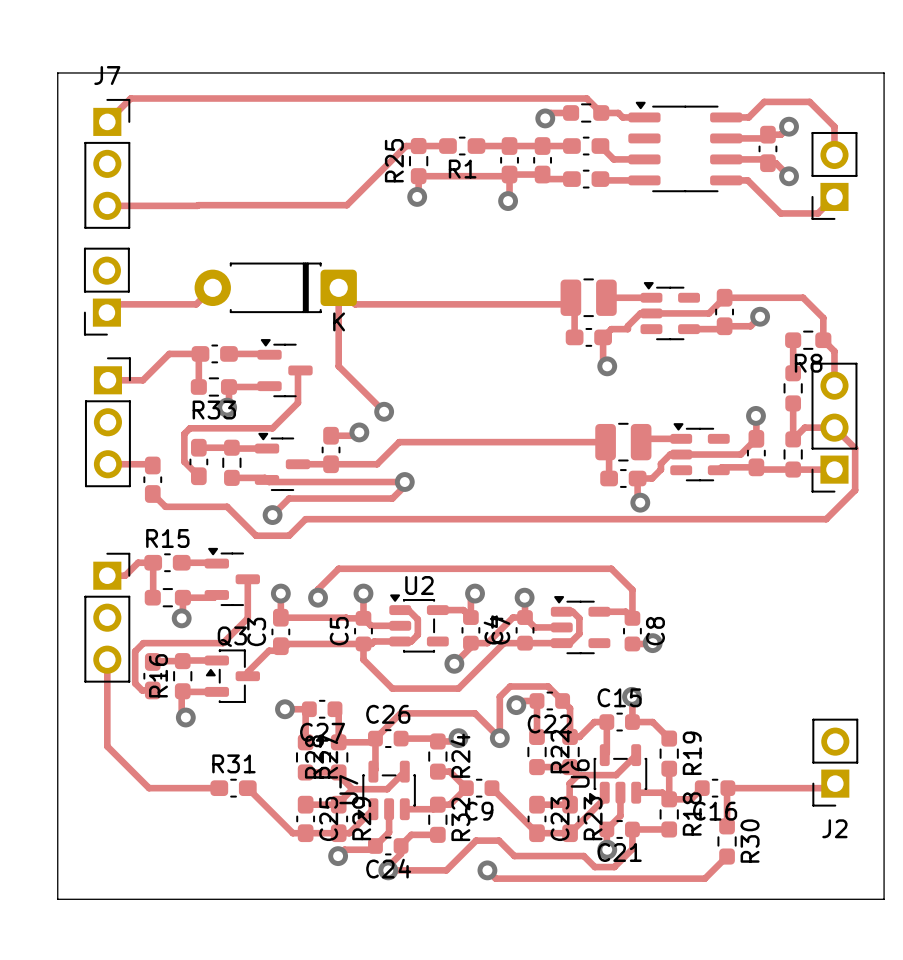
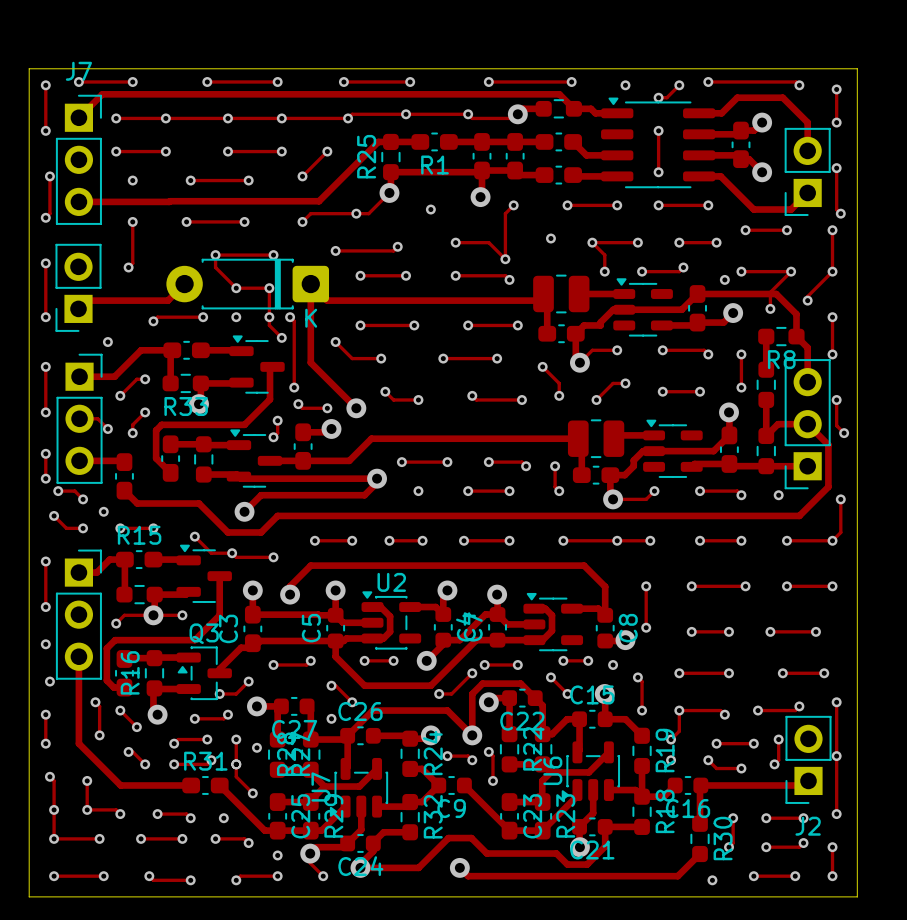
track: none -> (78, 81) (132, 81)
via: none -> (78, 81)
via: none -> (132, 81)
track: none -> (207, 81) (277, 81)
via: none -> (207, 81)
via: none -> (277, 81)
track: none -> (343, 81) (410, 81)
via: none -> (343, 81)
via: none -> (410, 81)
track: none -> (488, 81) (571, 81)
via: none -> (488, 81)
via: none -> (571, 81)
track: none -> (708, 81) (796, 81) (799, 85)
via: none -> (708, 81)
track: none -> (45, 85) (45, 130)
via: none -> (45, 85)
via: none -> (625, 85)
track: none -> (679, 85) (666, 97) (658, 97)
via: none -> (679, 85)
via: none -> (799, 85)
track: none -> (836, 89) (836, 122)
via: none -> (836, 89)
via: none -> (658, 97)
via: none -> (406, 114)
via: none -> (468, 114)
track: none -> (517, 114) (513, 118) (472, 118) (468, 114) (352, 114) (348, 118) (116, 118)
via: none -> (116, 118)
via: none -> (165, 118)
via: none -> (227, 118)
via: none -> (281, 118)
via: none -> (348, 118)
via: none -> (836, 122)
via: none -> (45, 130)
track: none -> (658, 130) (658, 172)
via: none -> (658, 130)
track: none -> (116, 151) (165, 151)
via: none -> (116, 151)
via: none -> (165, 151)
track: none -> (227, 151) (281, 151)
via: none -> (227, 151)
via: none -> (281, 151)
track: none -> (327, 151) (302, 176)
via: none -> (327, 151)
track: none -> (836, 168) (836, 209) (840, 213)
via: none -> (836, 168)
via: none -> (658, 172)
track: none -> (49, 176) (49, 213) (45, 217)
via: none -> (49, 176)
via: none -> (302, 176)
via: none -> (132, 180)
track: none -> (190, 180) (248, 180)
via: none -> (190, 180)
via: none -> (248, 180)
track: none -> (389, 192) (368, 213) (310, 213) (302, 221)
track: none -> (513, 205) (505, 213) (505, 259) (488, 242) (455, 242)
via: none -> (513, 205)
track: none -> (567, 205) (617, 205)
via: none -> (567, 205)
via: none -> (617, 205)
track: none -> (658, 205) (708, 205)
via: none -> (658, 205)
via: none -> (708, 205)
via: none -> (430, 209)
via: none -> (356, 213)
via: none -> (840, 213)
via: none -> (45, 217)
track: none -> (132, 221) (132, 263) (128, 267)
via: none -> (132, 221)
track: none -> (186, 221) (244, 221)
via: none -> (186, 221)
via: none -> (244, 221)
via: none -> (302, 221)
track: none -> (745, 230) (786, 230)
via: none -> (745, 230)
via: none -> (786, 230)
track: none -> (832, 230) (832, 271) (807, 296) (807, 300)
via: none -> (832, 230)
via: none -> (550, 238)
via: none -> (455, 242)
via: none -> (592, 242)
track: none -> (637, 242) (592, 242) (604, 255) (604, 271)
via: none -> (637, 242)
track: none -> (679, 242) (716, 242)
via: none -> (679, 242)
via: none -> (716, 242)
track: none -> (397, 246) (393, 250) (335, 250)
via: none -> (397, 246)
via: none -> (335, 250)
via: none -> (215, 255)
track: none -> (273, 255) (215, 255) (215, 267) (236, 288) (269, 288) (269, 325) (281, 337)
via: none -> (273, 255)
via: none -> (505, 259)
track: none -> (45, 263) (45, 317)
via: none -> (45, 263)
via: none -> (128, 267)
track: none -> (683, 267) (679, 271) (642, 271)
via: none -> (683, 267)
via: none -> (604, 271)
via: none -> (642, 271)
track: none -> (741, 271) (791, 271) (770, 292) (770, 308)
via: none -> (741, 271)
via: none -> (791, 271)
via: none -> (832, 271)
track: none -> (360, 275) (406, 275)
via: none -> (360, 275)
via: none -> (406, 275)
track: none -> (455, 275) (505, 275) (509, 279)
via: none -> (455, 275)
via: none -> (509, 279)
via: none -> (724, 279)
via: none -> (236, 288)
via: none -> (269, 288)
via: none -> (807, 300)
via: none -> (770, 308)
via: none -> (45, 317)
track: none -> (203, 317) (157, 317) (153, 321)
via: none -> (203, 317)
via: none -> (236, 317)
via: none -> (269, 317)
track: none -> (290, 317) (294, 321) (294, 387)
via: none -> (290, 317)
track: none -> (832, 317) (832, 354)
via: none -> (832, 317)
via: none -> (153, 321)
track: none -> (360, 325) (414, 325)
via: none -> (360, 325)
via: none -> (414, 325)
track: none -> (468, 325) (517, 325)
via: none -> (468, 325)
via: none -> (517, 325)
via: none -> (281, 337)
via: none -> (107, 342)
track: none -> (335, 342) (352, 358) (381, 358)
via: none -> (335, 342)
track: none -> (617, 350) (592, 350) (579, 362)
via: none -> (617, 350)
track: none -> (662, 350) (704, 350) (708, 354)
via: none -> (662, 350)
via: none -> (708, 354)
track: none -> (741, 354) (741, 387)
via: none -> (741, 354)
via: none -> (832, 354)
via: none -> (381, 358)
track: none -> (443, 358) (497, 358)
via: none -> (443, 358)
via: none -> (497, 358)
track: none -> (45, 366) (45, 412)
via: none -> (45, 366)
track: none -> (542, 366) (559, 383) (559, 395)
via: none -> (542, 366)
track: none -> (145, 379) (136, 379) (120, 395)
via: none -> (145, 379)
track: none -> (625, 383) (613, 383) (596, 399)
via: none -> (625, 383)
via: none -> (294, 387)
via: none -> (741, 387)
track: none -> (385, 391) (393, 399) (418, 399)
via: none -> (385, 391)
track: none -> (662, 391) (700, 391)
via: none -> (662, 391)
via: none -> (700, 391)
via: none -> (120, 395)
track: none -> (472, 395) (476, 399) (521, 399)
via: none -> (472, 395)
via: none -> (559, 395)
via: none -> (418, 399)
via: none -> (521, 399)
via: none -> (596, 399)
track: none -> (836, 399) (836, 425) (844, 433)
via: none -> (836, 399)
track: none -> (298, 404) (302, 408) (327, 408)
via: none -> (298, 404)
via: none -> (327, 408)
via: none -> (45, 412)
track: none -> (145, 412) (132, 424) (132, 433)
via: none -> (145, 412)
track: none -> (79, 418) (97, 418) (107, 428)
track: none -> (277, 420) (277, 433) (273, 437)
via: none -> (277, 420)
via: none -> (107, 428)
via: none -> (132, 433)
via: none -> (844, 433)
via: none -> (273, 437)
track: none -> (45, 453) (45, 478)
via: none -> (45, 453)
track: none -> (401, 462) (447, 462)
via: none -> (401, 462)
via: none -> (447, 462)
track: none -> (488, 462) (521, 462) (526, 466)
via: none -> (488, 462)
via: none -> (526, 466)
track: none -> (555, 466) (555, 486) (559, 491)
via: none -> (555, 466)
via: none -> (45, 478)
track: none -> (58, 491) (74, 491) (83, 499)
via: none -> (58, 491)
via: none -> (418, 491)
track: none -> (468, 491) (509, 491)
via: none -> (468, 491)
via: none -> (509, 491)
via: none -> (559, 491)
track: none -> (654, 491) (646, 499) (613, 499)
via: none -> (654, 491)
track: none -> (700, 491) (737, 491) (741, 495)
via: none -> (700, 491)
via: none -> (741, 495)
via: none -> (778, 495)
via: none -> (83, 499)
track: none -> (840, 499) (840, 532) (832, 540) (786, 540)
via: none -> (840, 499)
via: none -> (103, 511)
track: none -> (54, 515) (66, 528) (83, 528)
via: none -> (54, 515)
via: none -> (83, 528)
track: none -> (120, 528) (153, 528)
via: none -> (120, 528)
via: none -> (153, 528)
track: none -> (194, 536) (211, 553) (232, 553) (236, 557) (273, 557)
via: none -> (194, 536)
track: none -> (314, 540) (352, 540)
via: none -> (314, 540)
via: none -> (352, 540)
track: none -> (389, 540) (422, 540)
via: none -> (389, 540)
via: none -> (422, 540)
track: none -> (464, 540) (509, 540)
via: none -> (464, 540)
via: none -> (509, 540)
track: none -> (563, 540) (650, 540)
via: none -> (563, 540)
via: none -> (617, 540)
via: none -> (650, 540)
track: none -> (700, 540) (741, 540)
via: none -> (700, 540)
via: none -> (741, 540)
via: none -> (786, 540)
via: none -> (832, 540)
via: none -> (232, 553)
via: none -> (273, 557)
track: none -> (45, 561) (45, 607)
via: none -> (45, 561)
track: none -> (646, 586) (646, 627)
via: none -> (646, 586)
track: none -> (691, 586) (745, 586)
via: none -> (691, 586)
via: none -> (745, 586)
track: none -> (786, 586) (832, 586)
via: none -> (786, 586)
via: none -> (832, 586)
via: none -> (45, 607)
track: none -> (182, 615) (124, 615) (116, 623)
via: none -> (182, 615)
via: none -> (116, 623)
via: none -> (646, 627)
track: none -> (691, 631) (729, 631)
via: none -> (691, 631)
via: none -> (729, 631)
track: none -> (770, 631) (815, 631)
via: none -> (770, 631)
via: none -> (815, 631)
via: none -> (45, 644)
track: none -> (310, 660) (306, 665) (273, 665)
via: none -> (310, 660)
track: none -> (364, 660) (393, 660)
via: none -> (364, 660)
via: none -> (393, 660)
track: none -> (563, 660) (588, 660)
via: none -> (563, 660)
via: none -> (588, 660)
via: none -> (273, 665)
track: none -> (484, 665) (517, 665)
via: none -> (484, 665)
via: none -> (517, 665)
via: none -> (613, 665)
track: none -> (472, 673) (451, 693) (439, 693)
via: none -> (472, 673)
track: none -> (679, 673) (729, 673)
via: none -> (679, 673)
via: none -> (729, 673)
track: none -> (782, 673) (824, 673)
via: none -> (782, 673)
via: none -> (824, 673)
track: none -> (550, 677) (567, 693)
via: none -> (550, 677)
track: none -> (637, 677) (642, 681) (642, 710)
via: none -> (637, 677)
via: none -> (49, 681)
track: none -> (248, 681) (236, 693) (219, 693)
via: none -> (248, 681)
track: none -> (331, 685) (335, 685) (352, 702)
via: none -> (331, 685)
via: none -> (219, 693)
via: none -> (439, 693)
via: none -> (567, 693)
track: none -> (95, 702) (99, 706) (99, 735)
via: none -> (95, 702)
via: none -> (352, 702)
track: none -> (836, 702) (836, 814)
via: none -> (836, 702)
track: none -> (799, 706) (795, 710) (757, 710)
via: none -> (799, 706)
track: none -> (120, 710) (136, 727)
via: none -> (120, 710)
via: none -> (642, 710)
via: none -> (679, 710)
via: none -> (757, 710)
track: none -> (45, 714) (45, 743)
via: none -> (45, 714)
track: none -> (227, 714) (223, 718) (194, 718)
via: none -> (227, 714)
track: none -> (724, 714) (720, 710) (679, 710) (679, 731) (671, 739)
via: none -> (724, 714)
via: none -> (194, 718)
via: none -> (331, 718)
via: none -> (136, 727)
via: none -> (99, 735)
track: none -> (207, 739) (178, 739) (174, 743)
via: none -> (207, 739)
track: none -> (236, 739) (236, 776) (252, 793)
via: none -> (236, 739)
via: none -> (671, 739)
track: none -> (778, 739) (778, 760) (774, 764)
via: none -> (778, 739)
via: none -> (45, 743)
via: none -> (174, 743)
track: none -> (716, 743) (753, 743)
via: none -> (716, 743)
via: none -> (753, 743)
via: none -> (256, 747)
track: none -> (128, 751) (132, 751) (145, 764)
via: none -> (128, 751)
track: none -> (488, 751) (492, 756) (492, 780)
via: none -> (488, 751)
track: none -> (447, 756) (468, 756) (472, 760)
via: none -> (447, 756)
via: none -> (836, 756)
track: none -> (211, 760) (207, 764) (174, 764)
via: none -> (211, 760)
via: none -> (472, 760)
via: none -> (671, 760)
track: none -> (708, 760) (716, 768) (741, 768)
via: none -> (708, 760)
via: none -> (145, 764)
via: none -> (174, 764)
via: none -> (236, 764)
via: none -> (774, 764)
via: none -> (741, 768)
track: none -> (49, 776) (54, 780) (54, 838) (99, 838)
via: none -> (49, 776)
track: none -> (87, 780) (87, 809) (116, 809) (120, 814)
via: none -> (87, 780)
via: none -> (492, 780)
via: none -> (252, 793)
via: none -> (54, 809)
via: none -> (87, 809)
via: none -> (120, 814)
track: none -> (157, 814) (186, 814) (190, 818)
via: none -> (157, 814)
via: none -> (836, 814)
via: none -> (190, 818)
via: none -> (223, 818)
track: none -> (733, 818) (733, 843) (729, 847)
via: none -> (733, 818)
track: none -> (766, 818) (803, 818)
via: none -> (766, 818)
via: none -> (803, 818)
via: none -> (54, 838)
via: none -> (99, 838)
track: none -> (141, 838) (182, 838)
via: none -> (141, 838)
via: none -> (182, 838)
track: none -> (215, 838) (244, 838) (248, 843)
via: none -> (215, 838)
via: none -> (248, 843)
track: none -> (803, 843) (799, 847) (766, 847)
via: none -> (803, 843)
via: none -> (729, 847)
via: none -> (766, 847)
track: none -> (832, 847) (832, 876)
via: none -> (832, 847)
track: none -> (310, 853) (310, 863) (323, 876)
via: none -> (277, 855)
track: none -> (54, 876) (103, 876)
via: none -> (54, 876)
via: none -> (103, 876)
track: none -> (149, 876) (153, 880) (190, 880)
via: none -> (149, 876)
track: none -> (277, 876) (240, 876) (236, 880)
via: none -> (277, 876)
via: none -> (323, 876)
track: none -> (753, 876) (795, 876)
via: none -> (753, 876)
via: none -> (795, 876)
via: none -> (832, 876)
via: none -> (190, 880)
via: none -> (236, 880)
via: none -> (712, 880)

